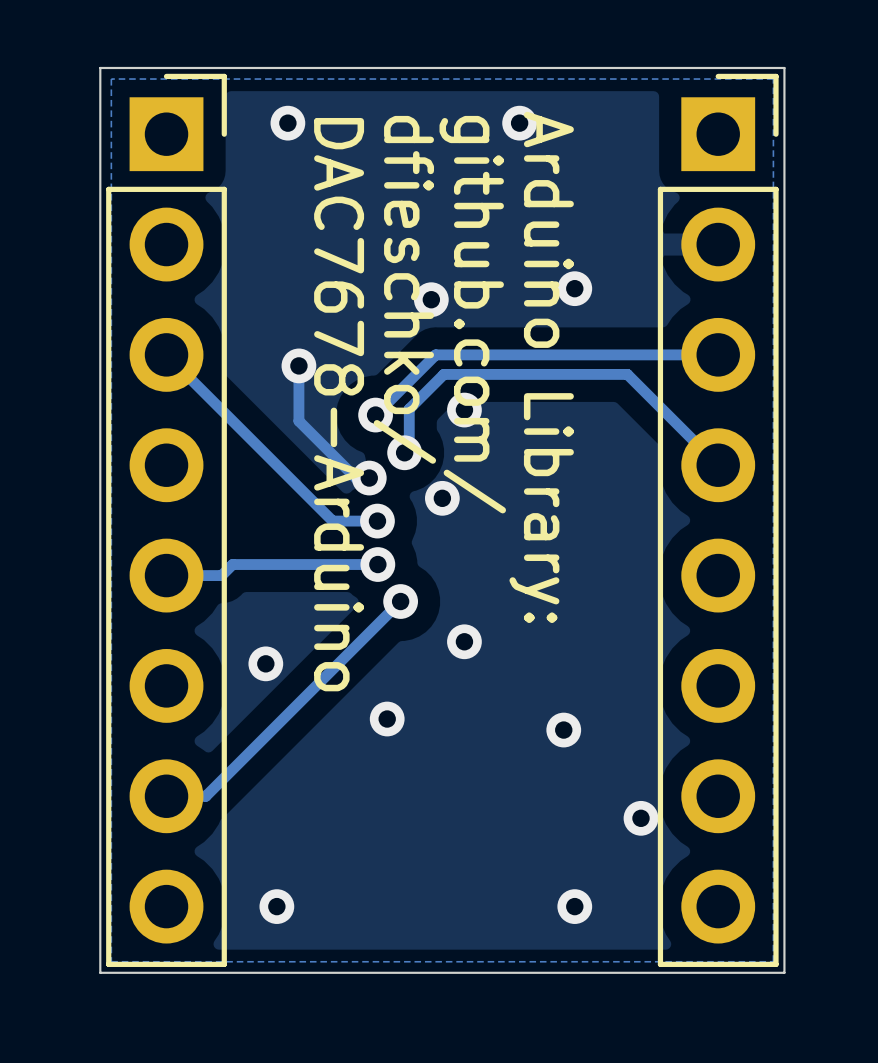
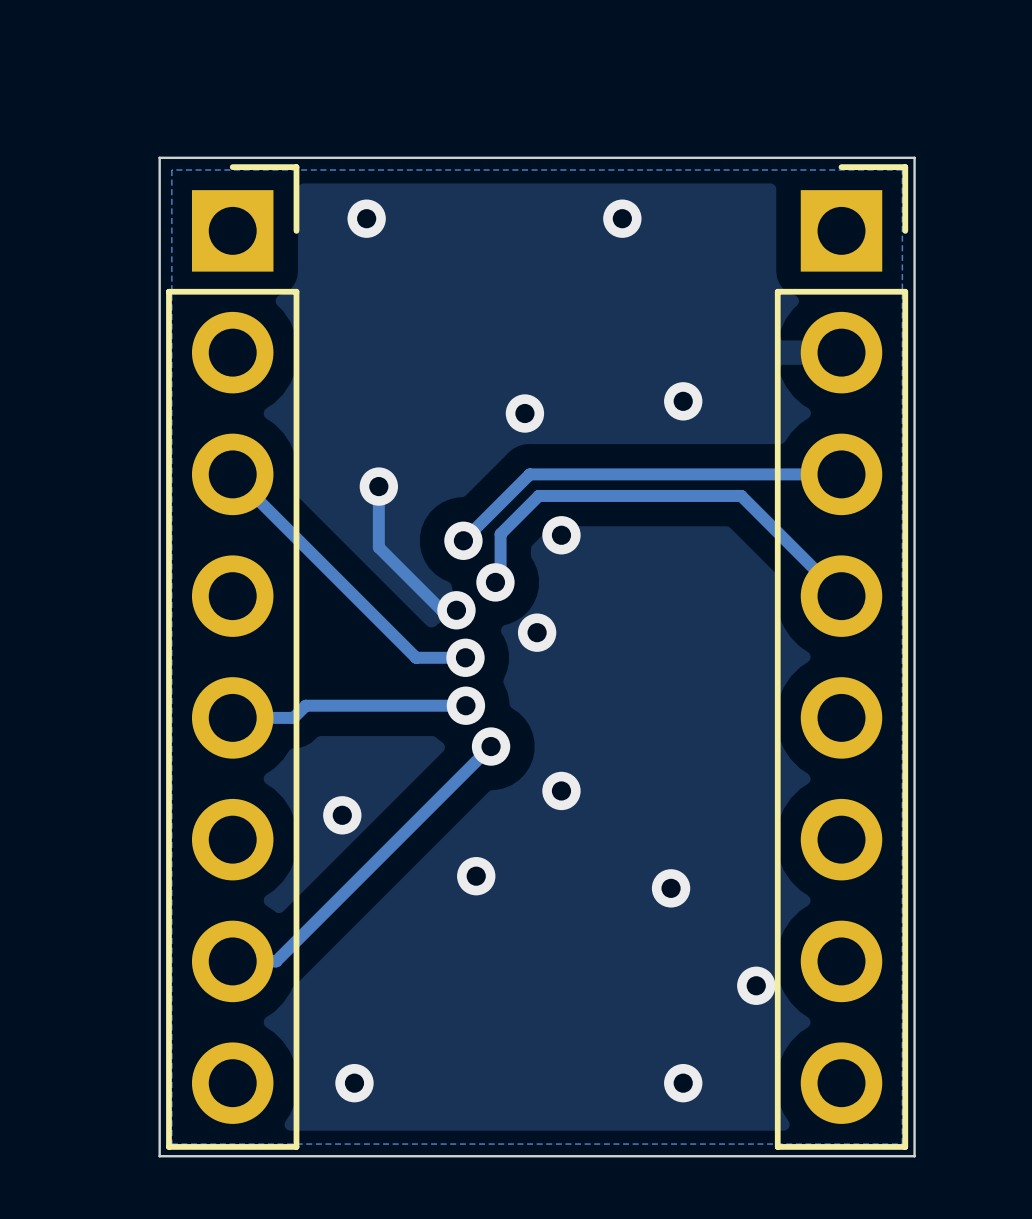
text: dfieschko/ (404, 289) -> none
text: github.com/ (472, 314) -> none
text: Arduino Library: (541, 367) -> none
text: DAC7678-Arduino (339, 404) -> none

